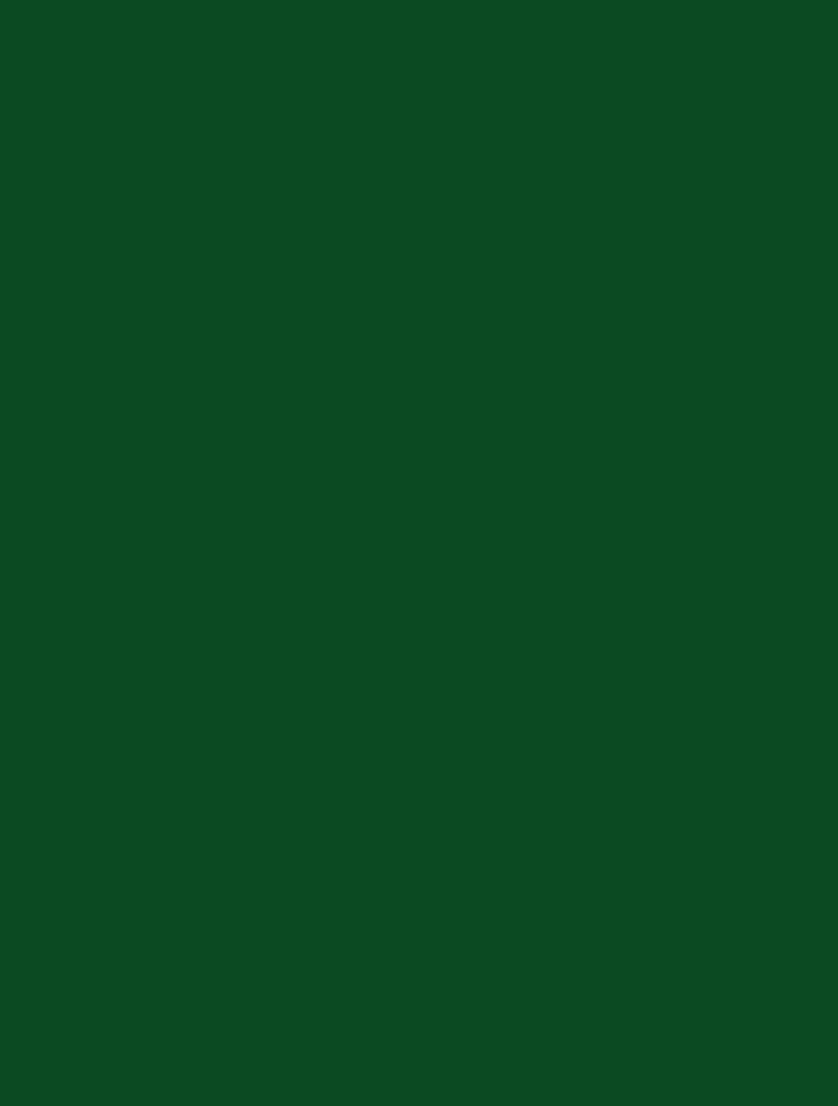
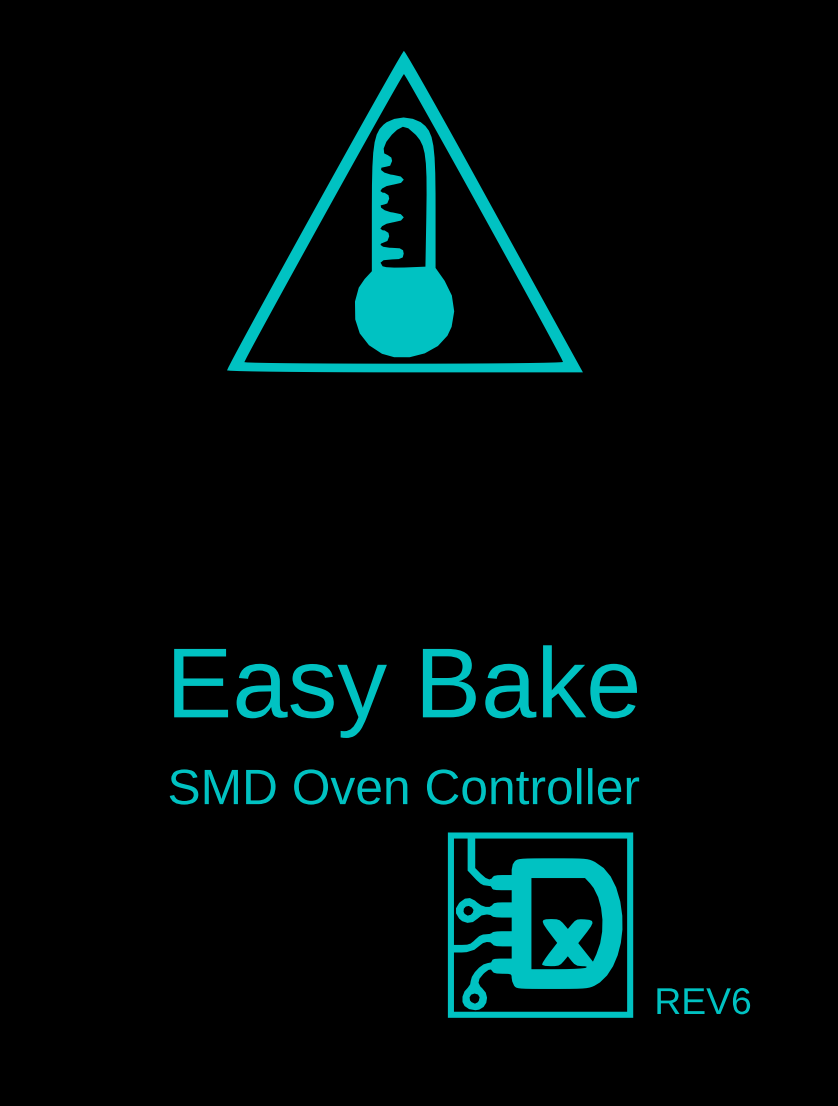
drawing: none -> [227, 50, 583, 373]
text: none -> Easy Bake (405, 691)
text: none -> SMD Oven Controller (404, 786)
drawing: none -> [447, 832, 634, 1018]
text: none -> REV6 (703, 1001)

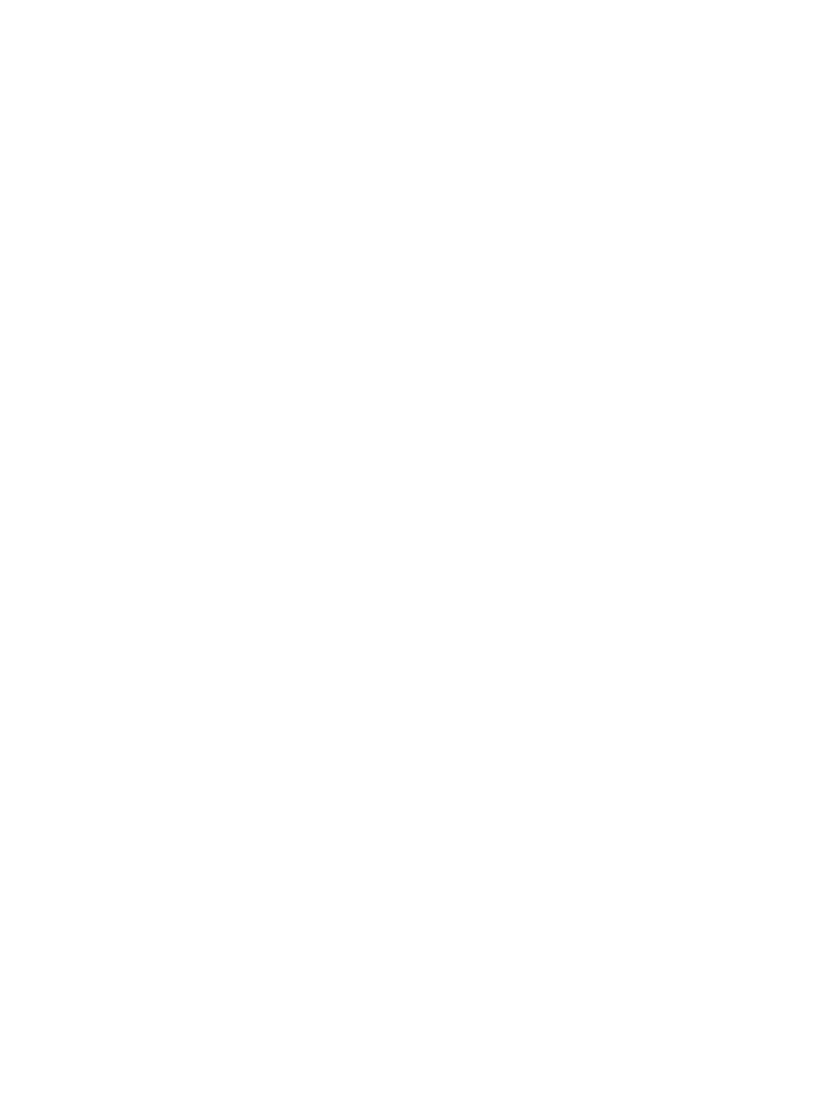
drawing: [227, 50, 583, 373] -> none
text: Easy Bake (405, 691) -> none
text: SMD Oven Controller (404, 786) -> none
drawing: [447, 832, 634, 1018] -> none
text: REV6 (703, 1001) -> none

